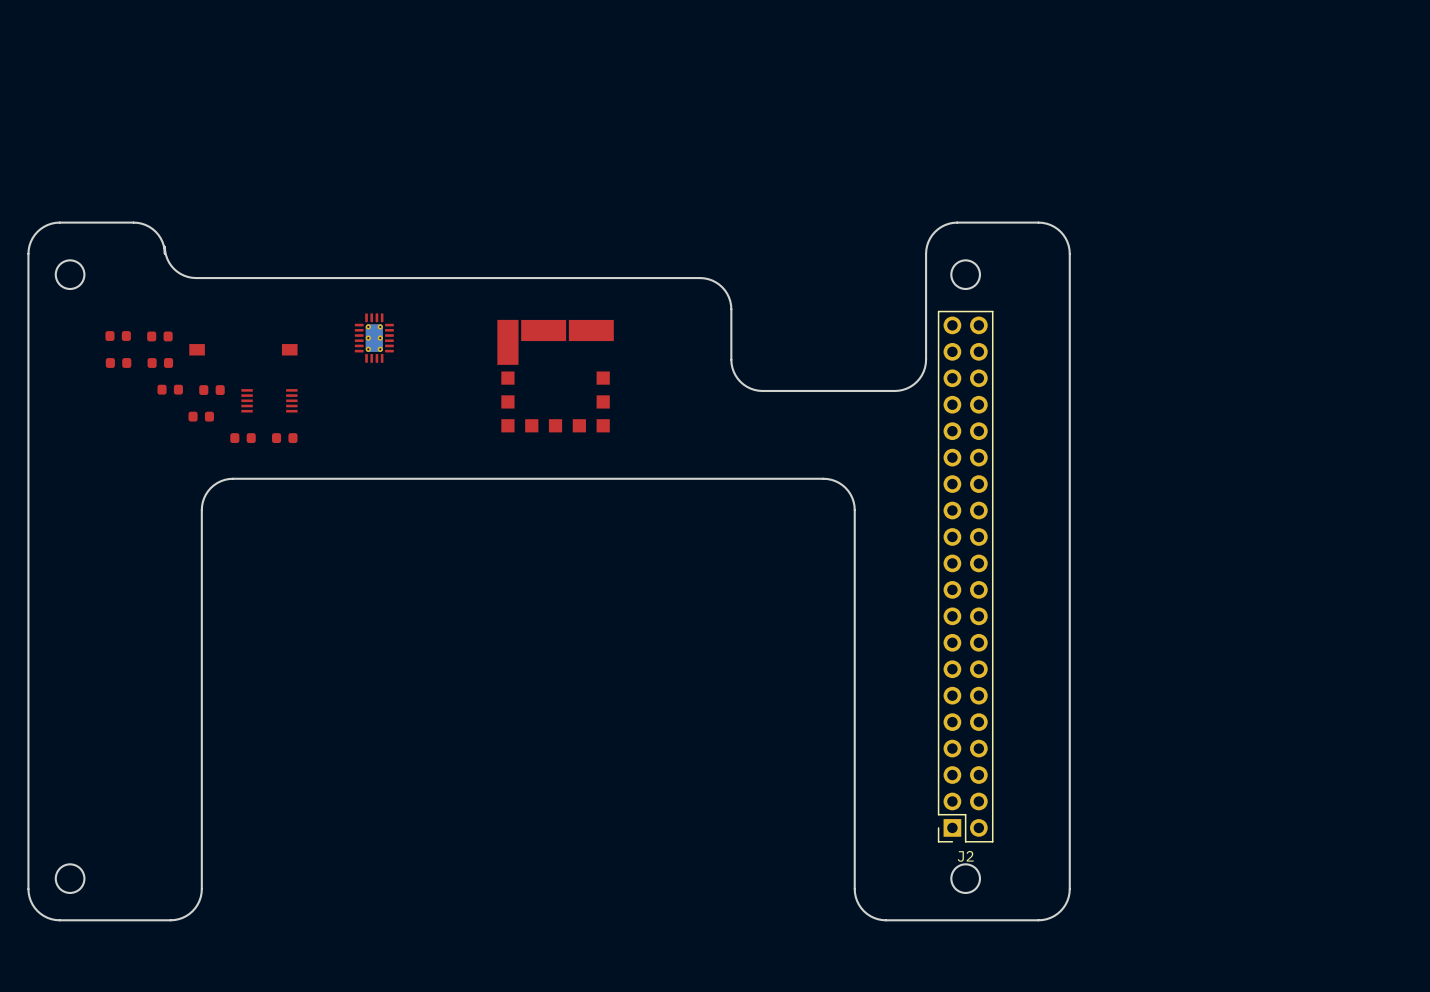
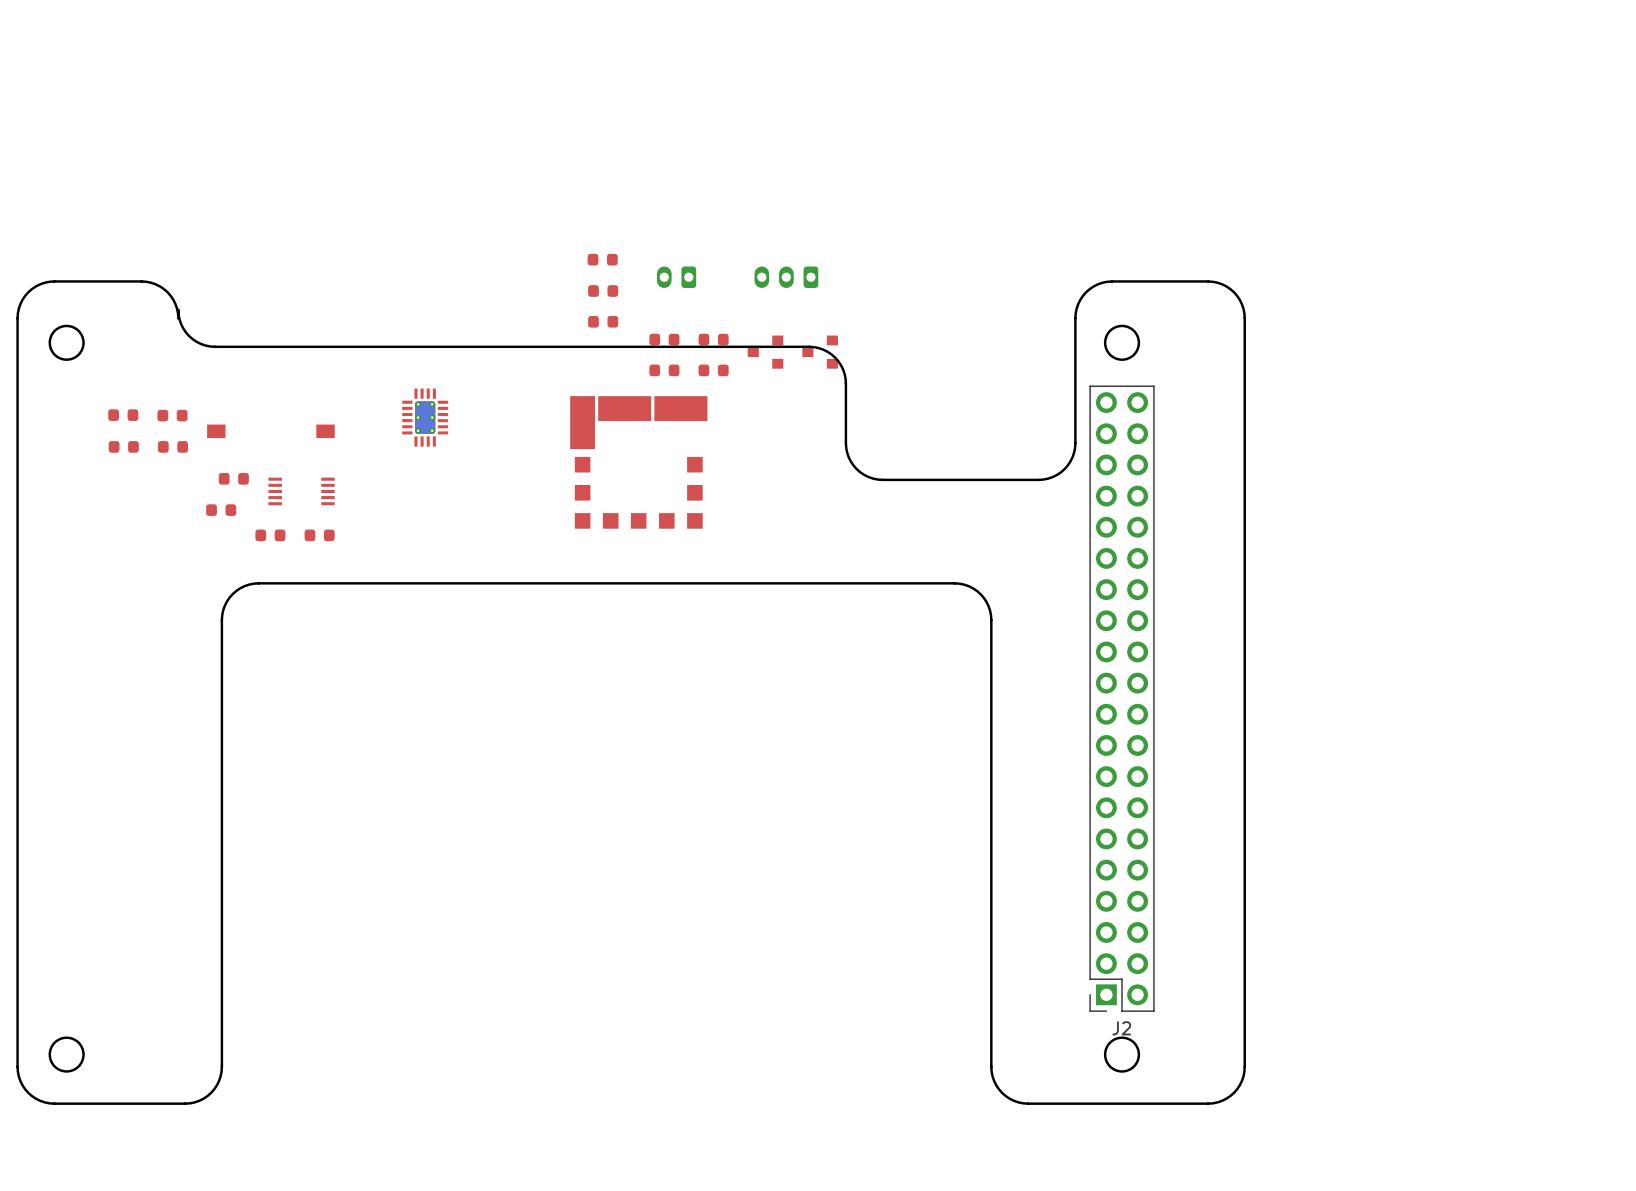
part: none -> (602, 259)
part: none -> (676, 277)
part: none -> (786, 277)
part: none -> (603, 291)
part: none -> (603, 321)
part: none -> (664, 339)
part: none -> (713, 339)
part: none -> (765, 352)
part: none -> (820, 352)
part: none -> (664, 370)
part: none -> (713, 370)
part: (170, 389) -> none

